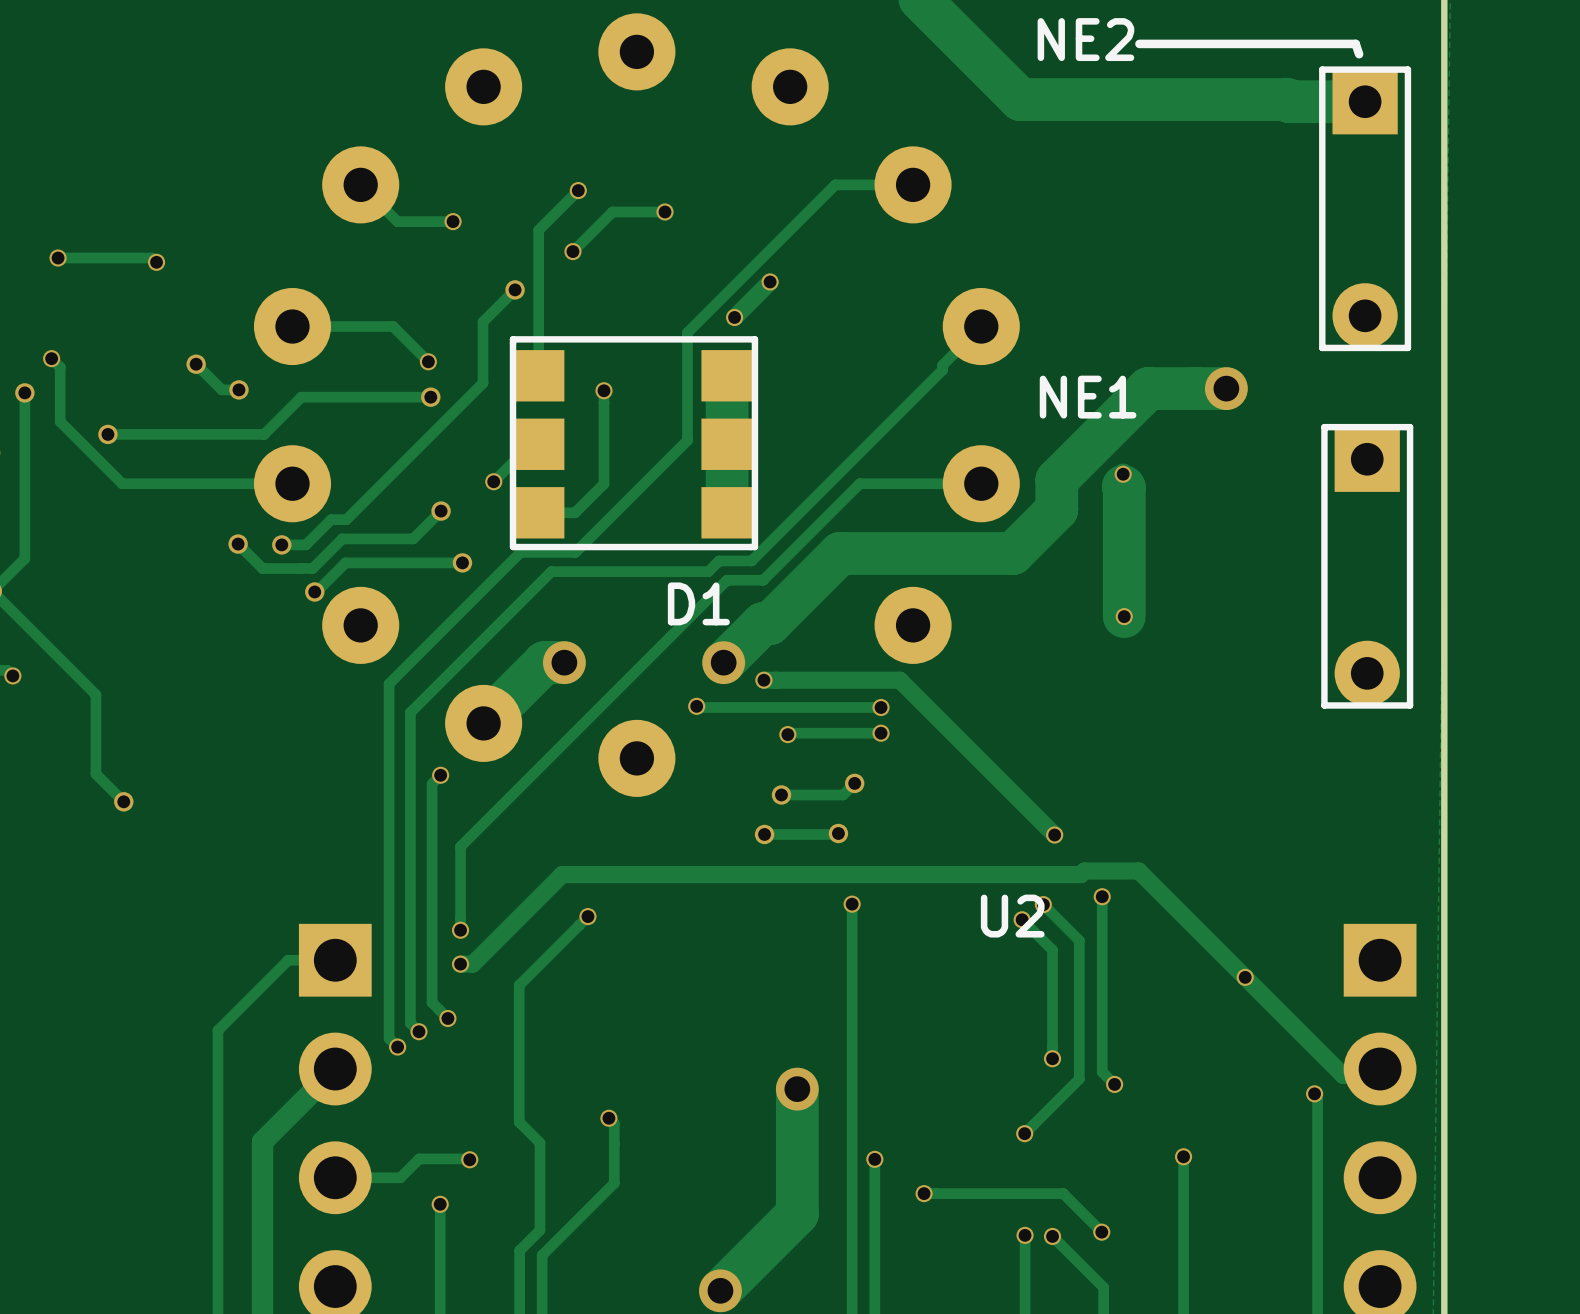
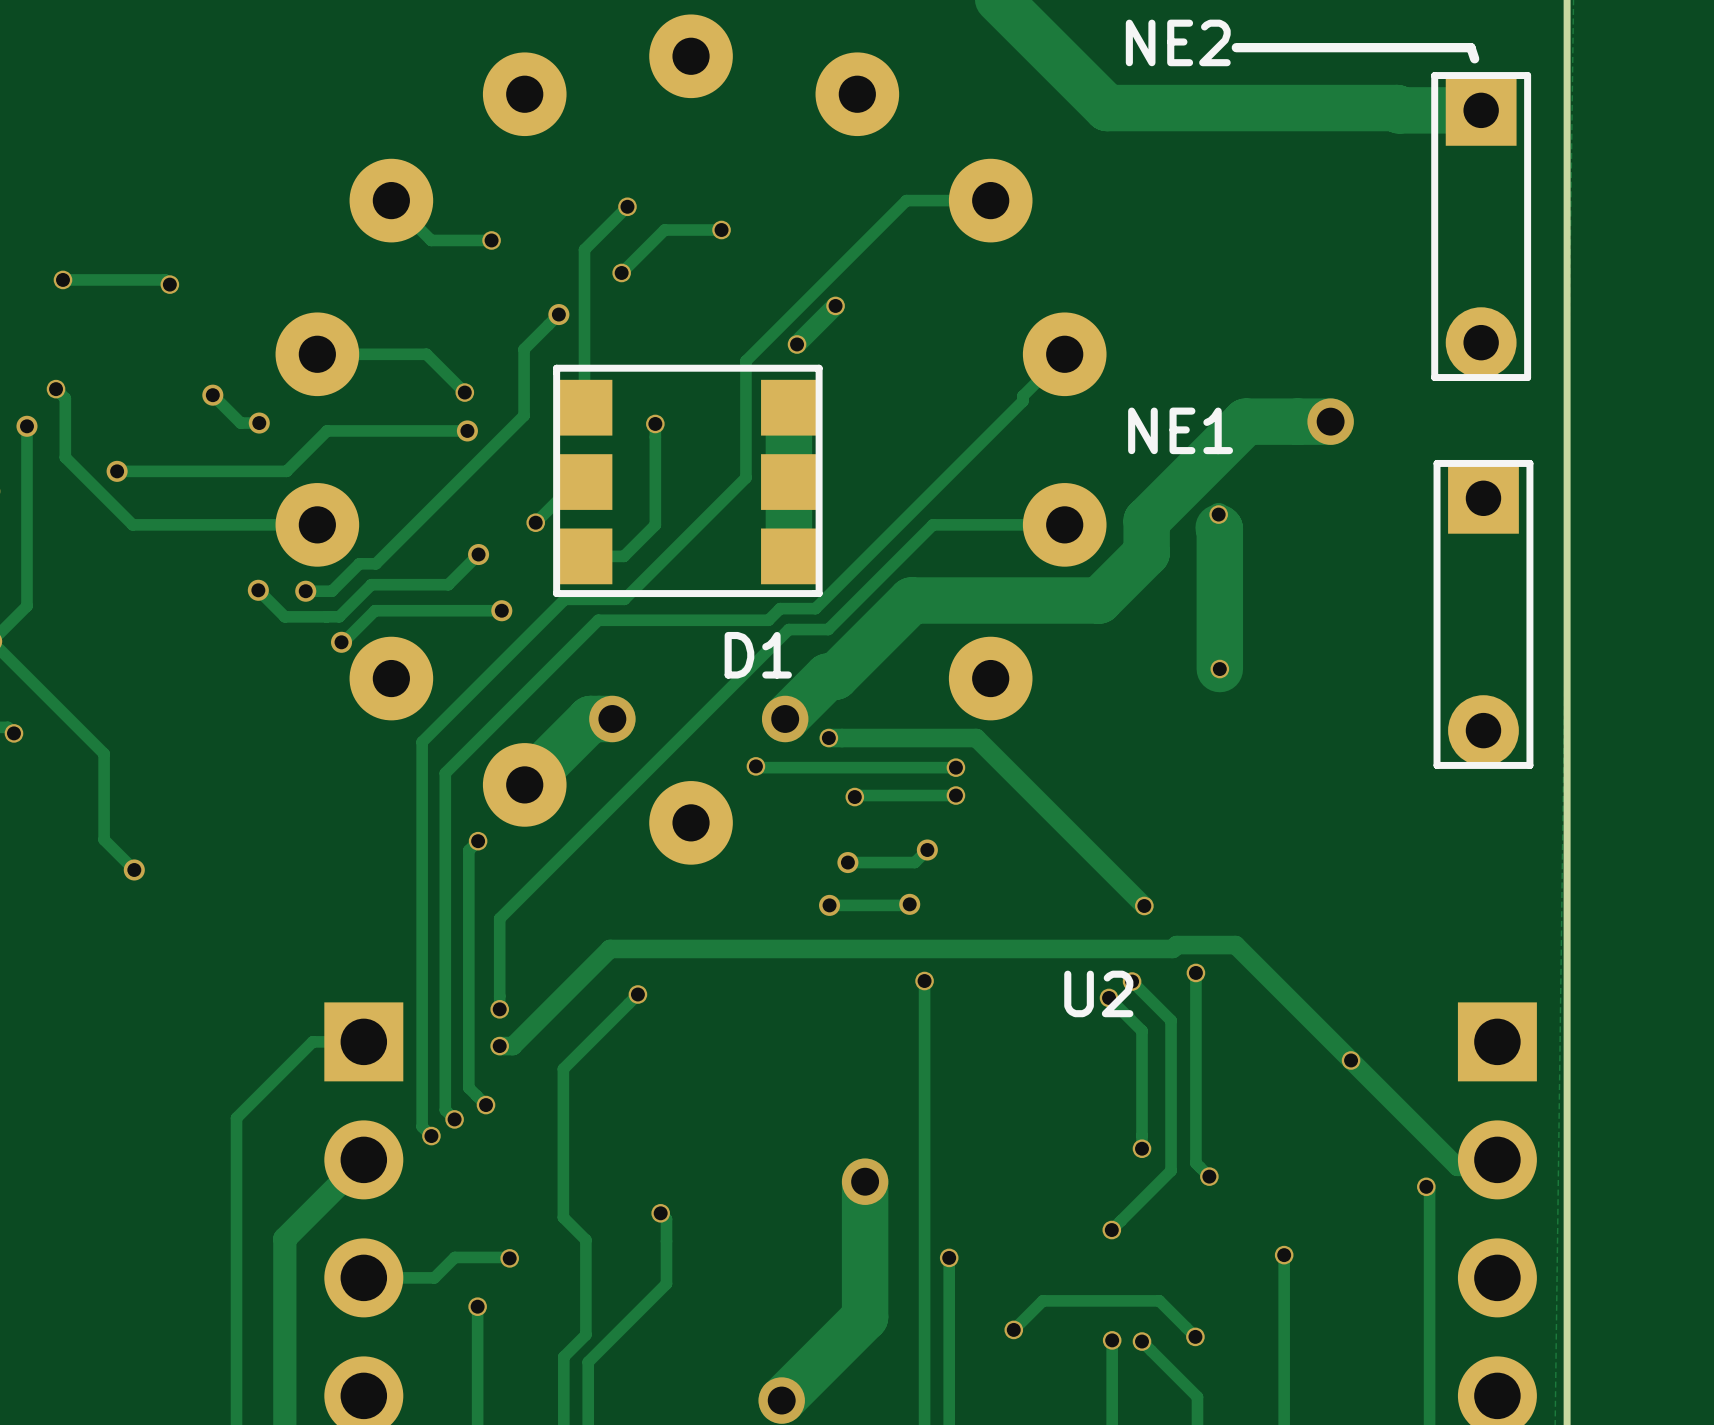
track: (924, 1193) (1063, 1193) (1068, 1198) -> (1013, 1329) (1042, 1300) (1159, 1300)
via position: (924, 1193) -> (1013, 1329)

